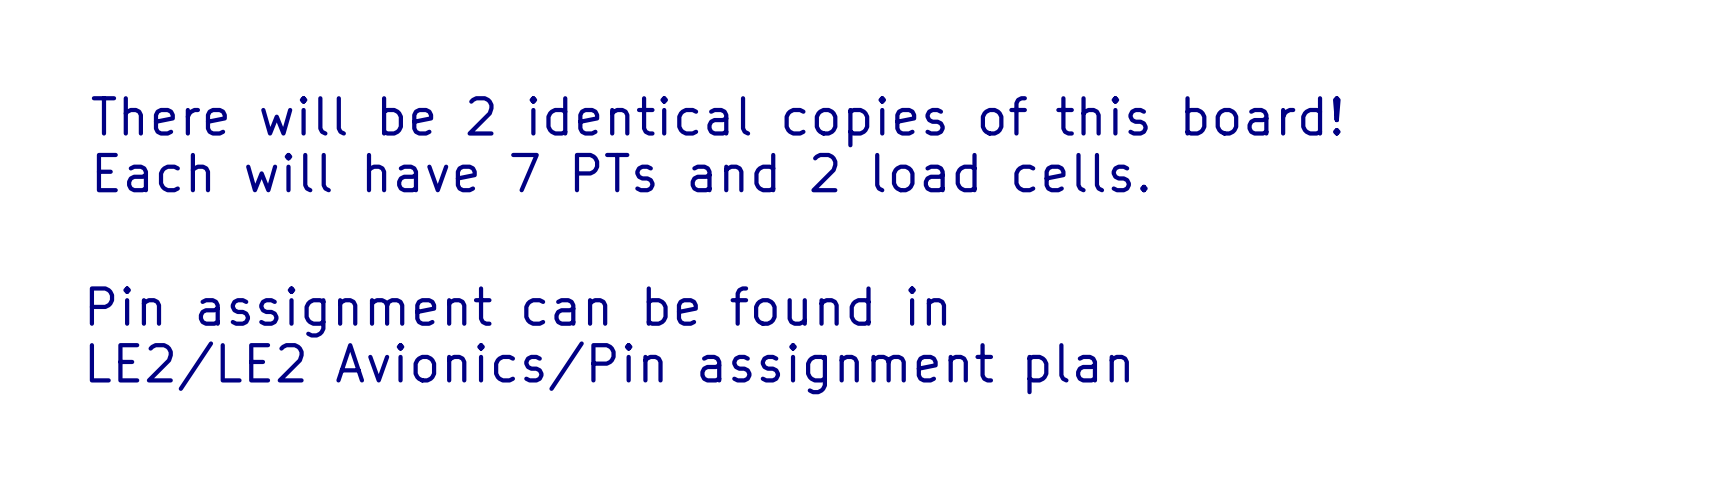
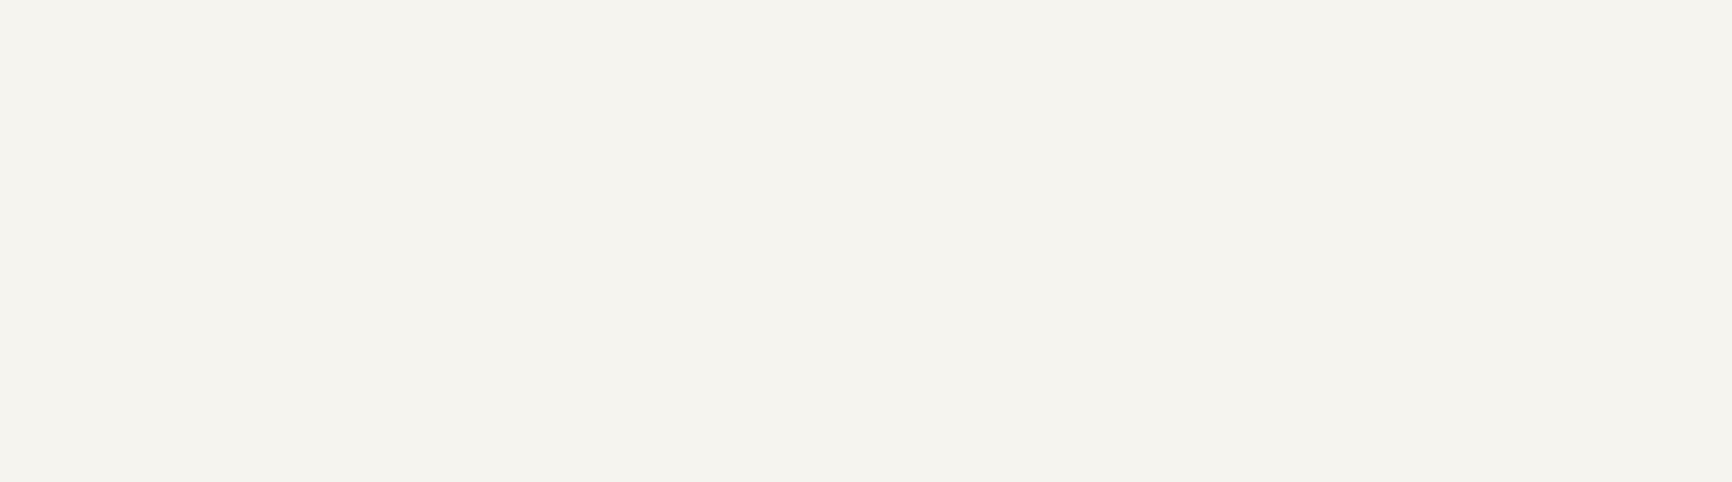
text: There will be 2 identical copies of this board! (716, 121) -> none
text: Each will have 7 PTs and 2 load cells. (622, 172) -> none
text: Pin assignment can be found in (517, 311) -> none
text: LE2/LE2 Avionics/Pin assignment plan (609, 367) -> none

